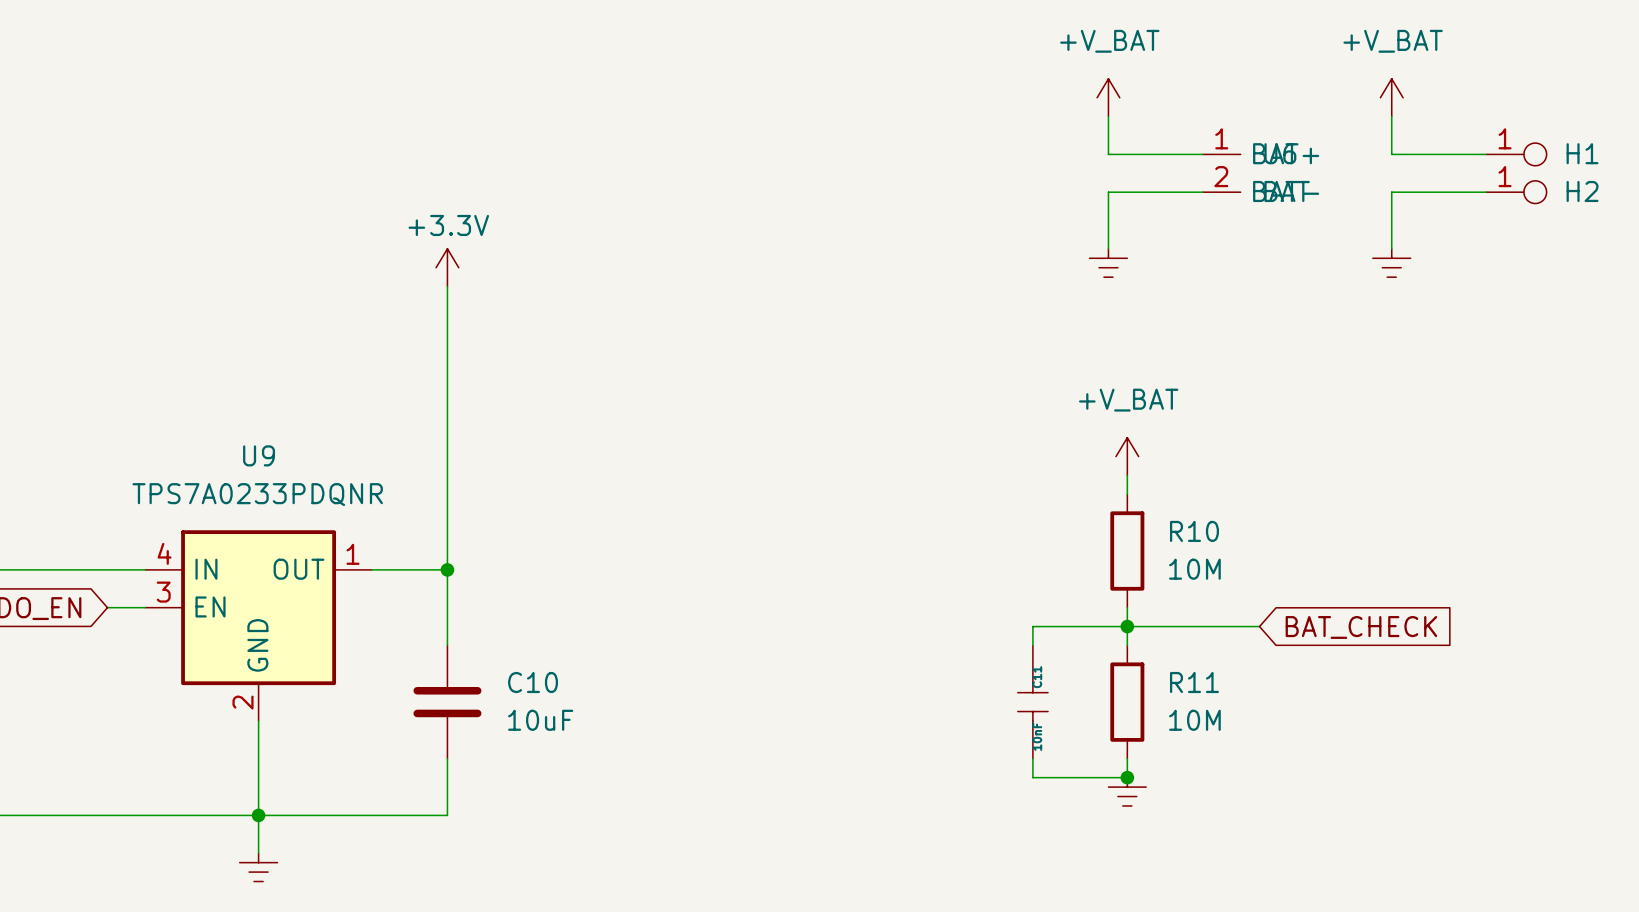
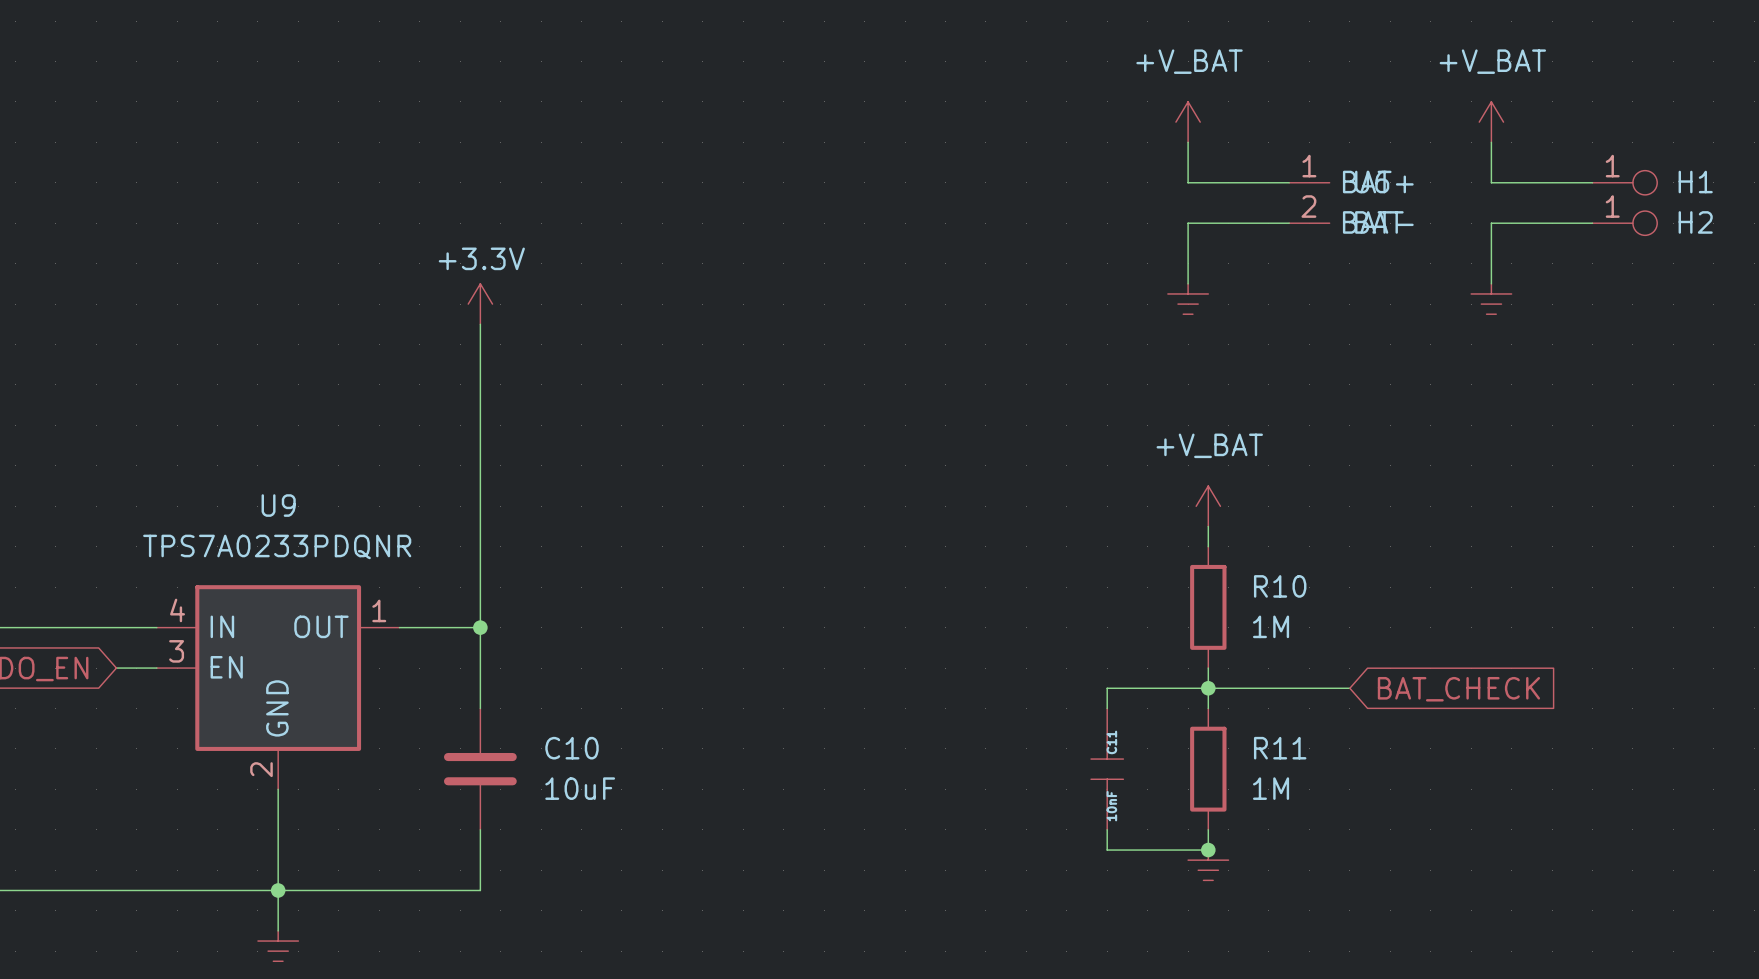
R10 value: 10M (1194, 569) -> 1M (1271, 626)
R11 value: 10M (1194, 720) -> 1M (1271, 788)

